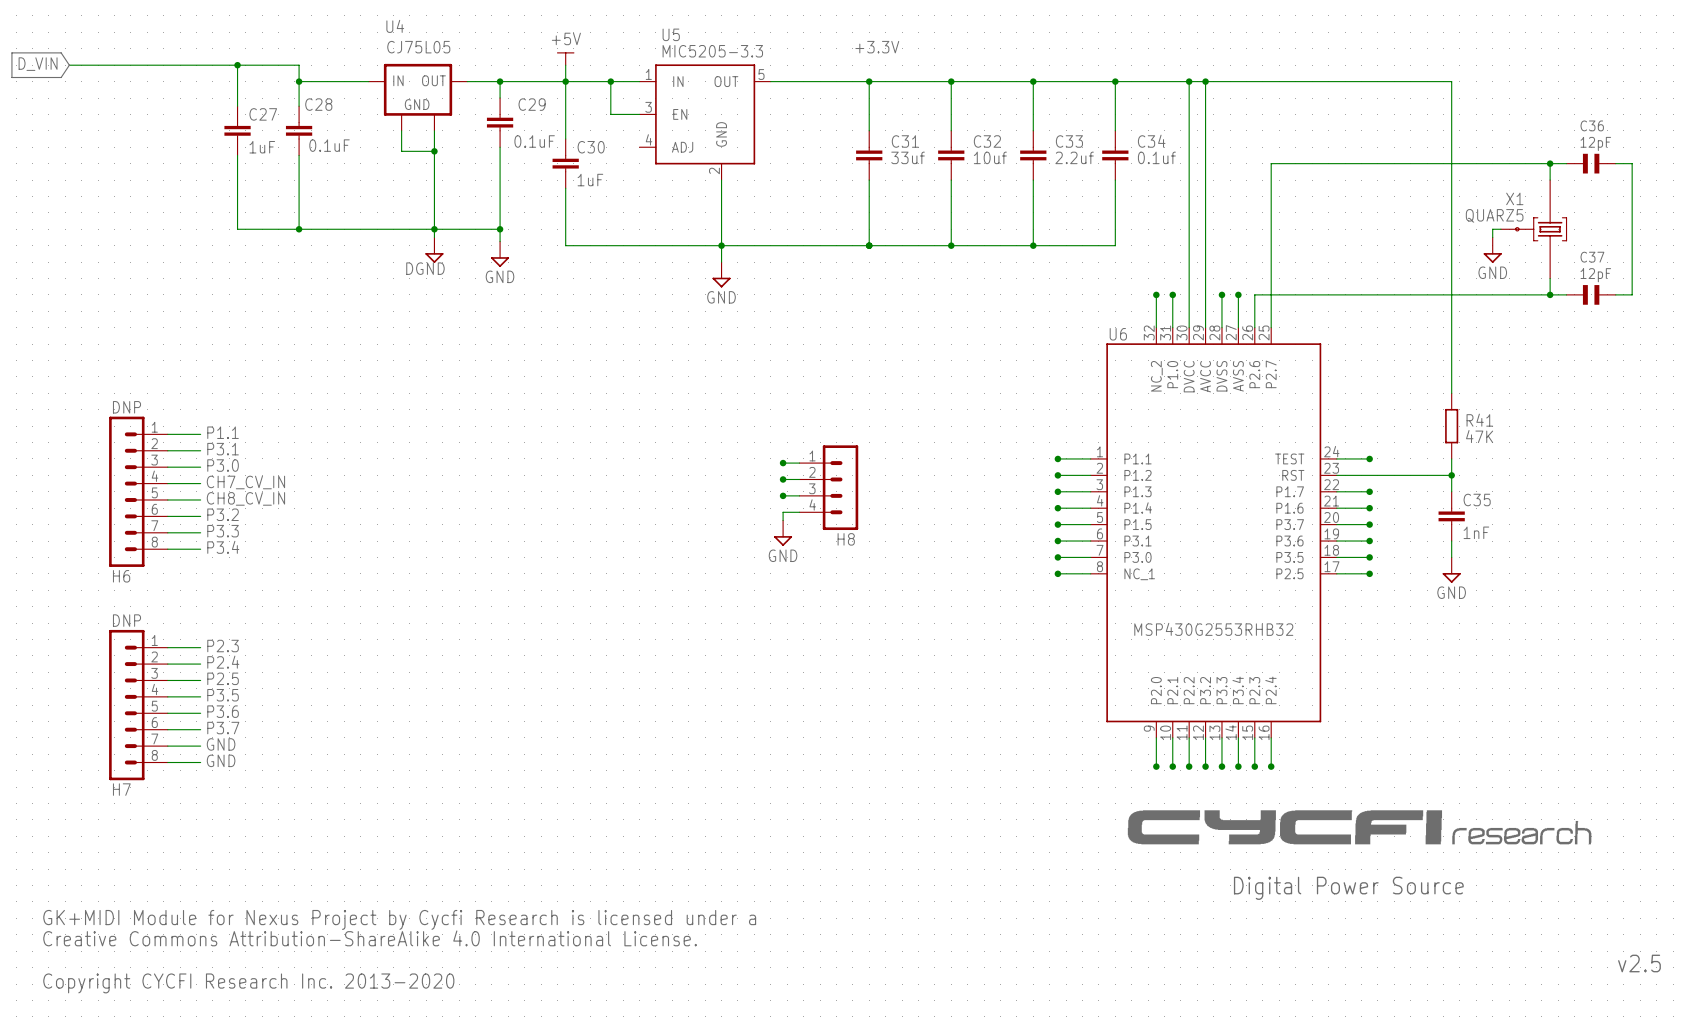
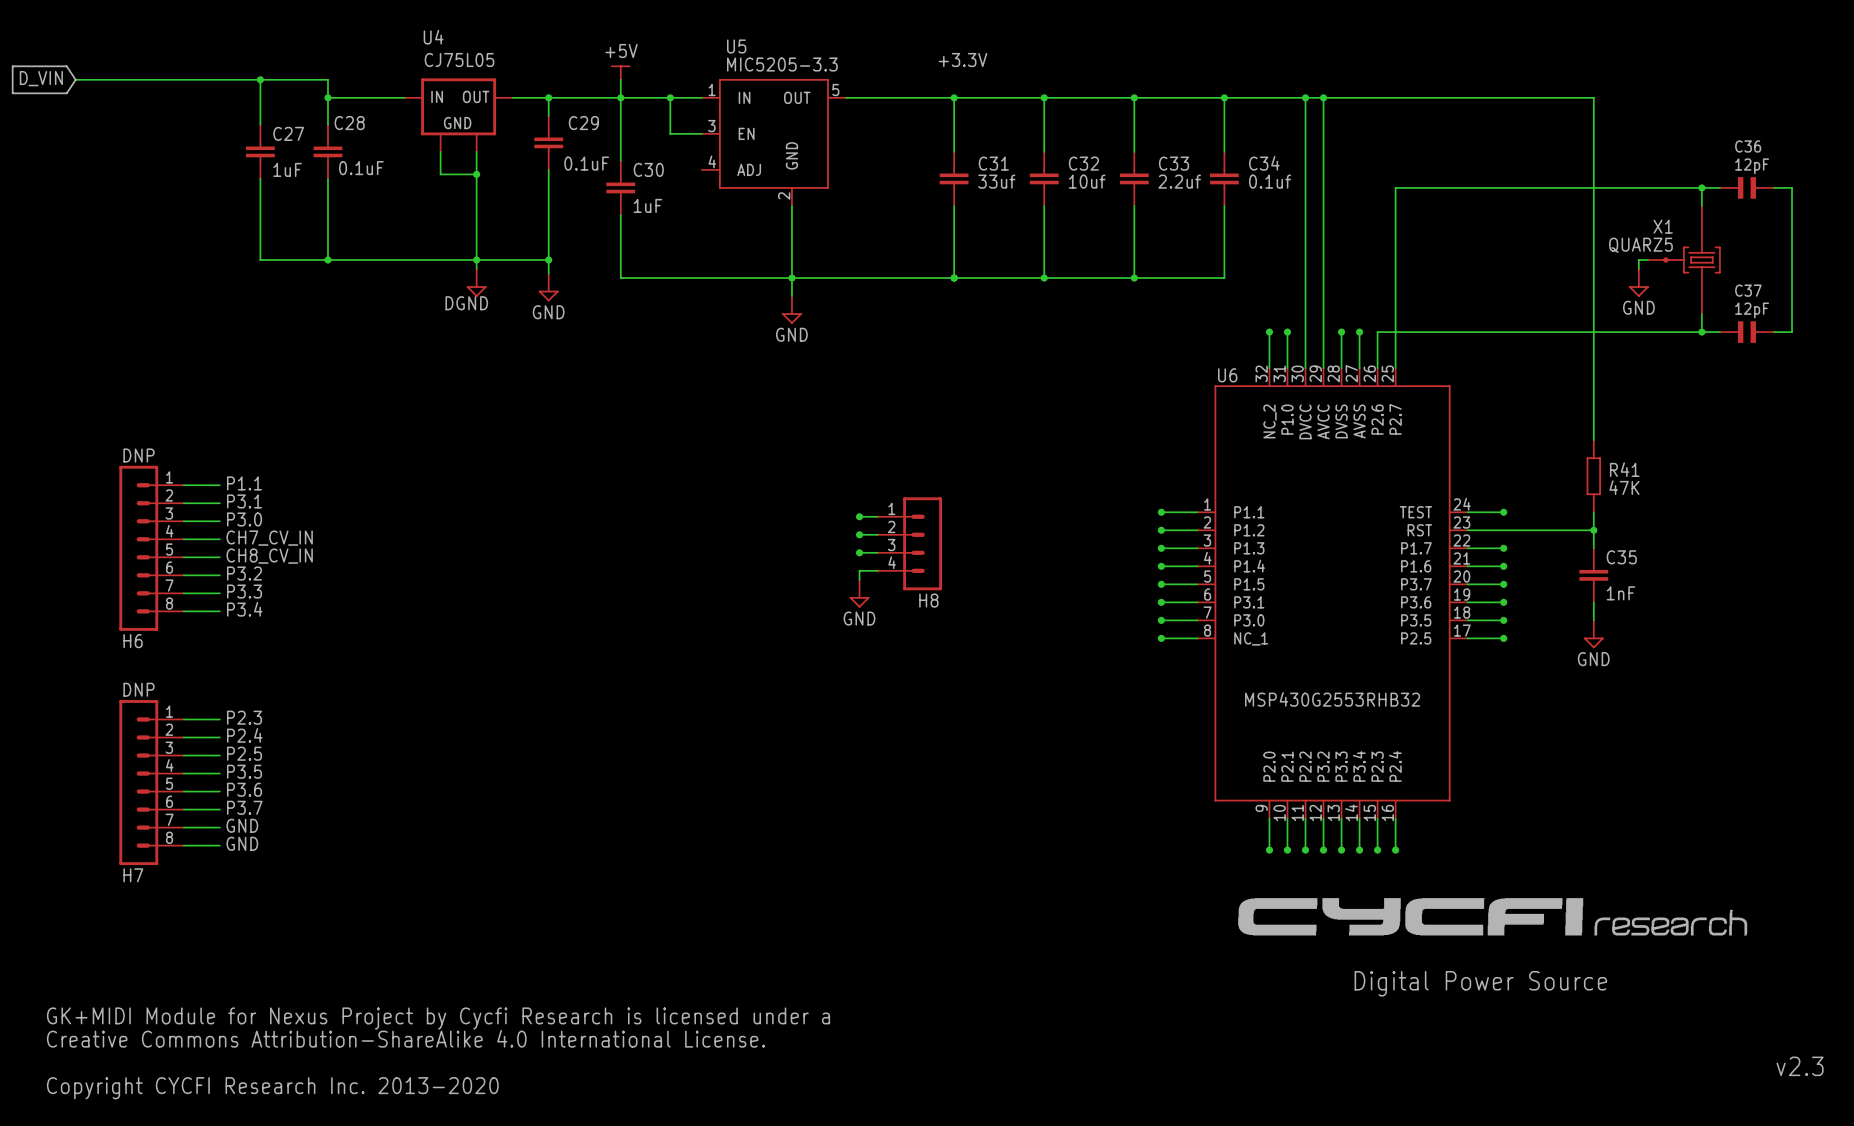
text: v2.5 (1639, 963) -> v2.3 (1800, 1066)

